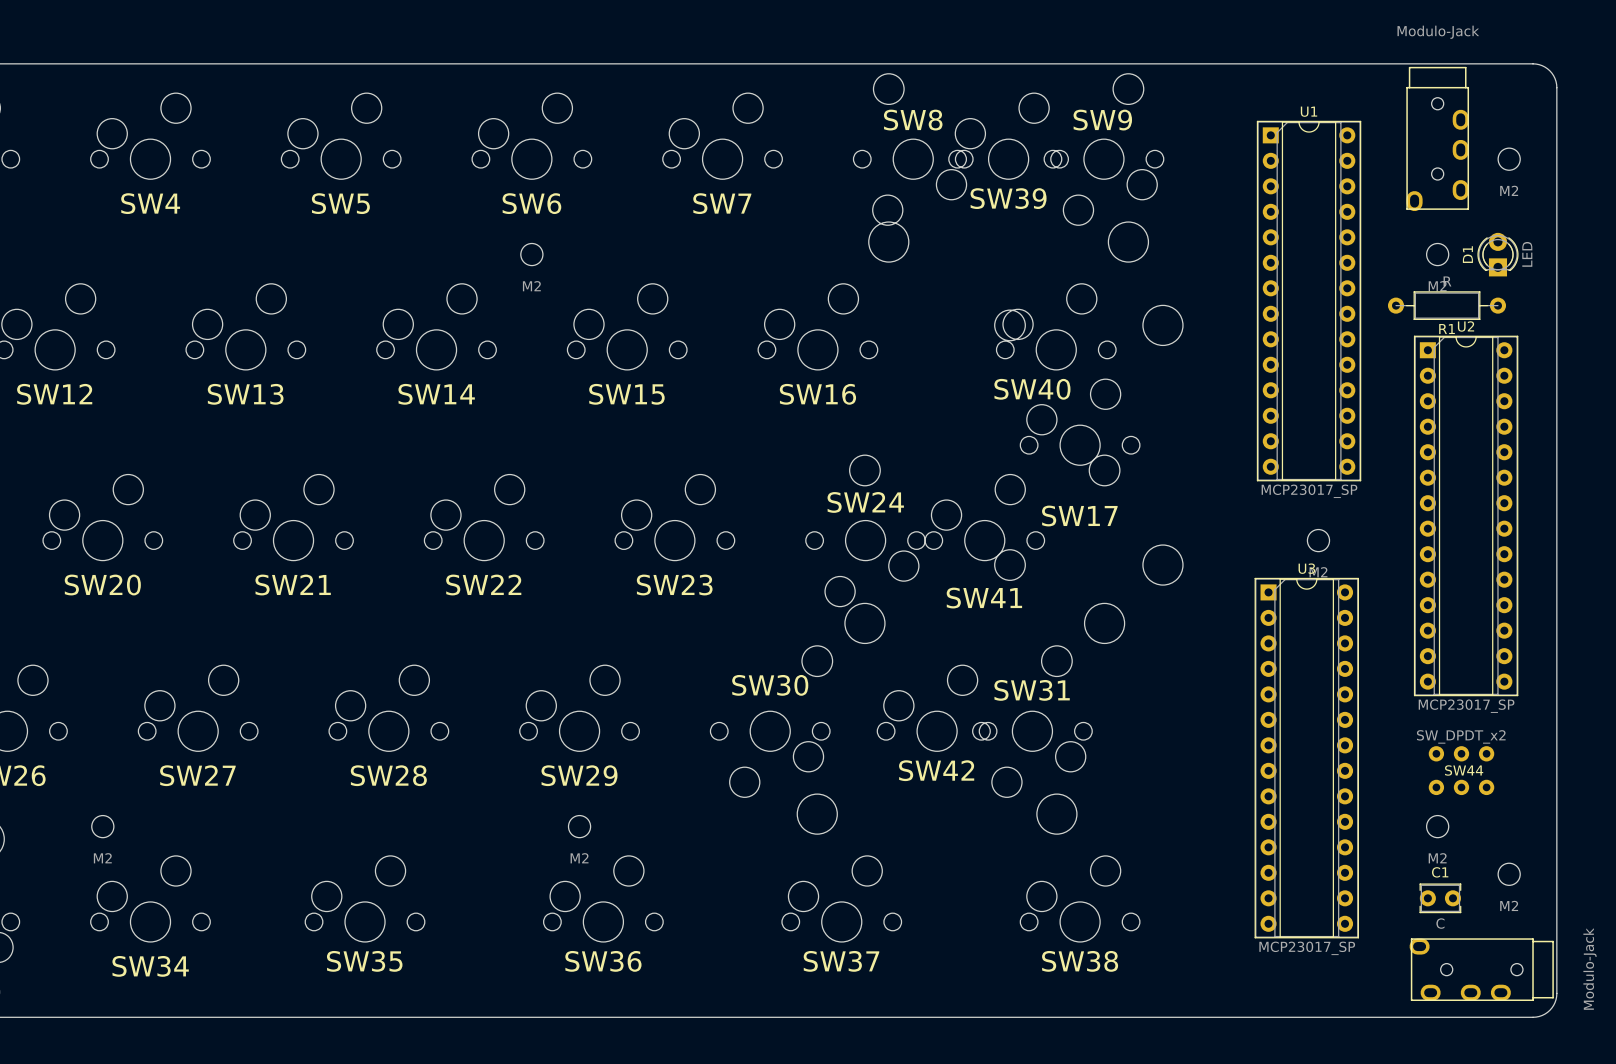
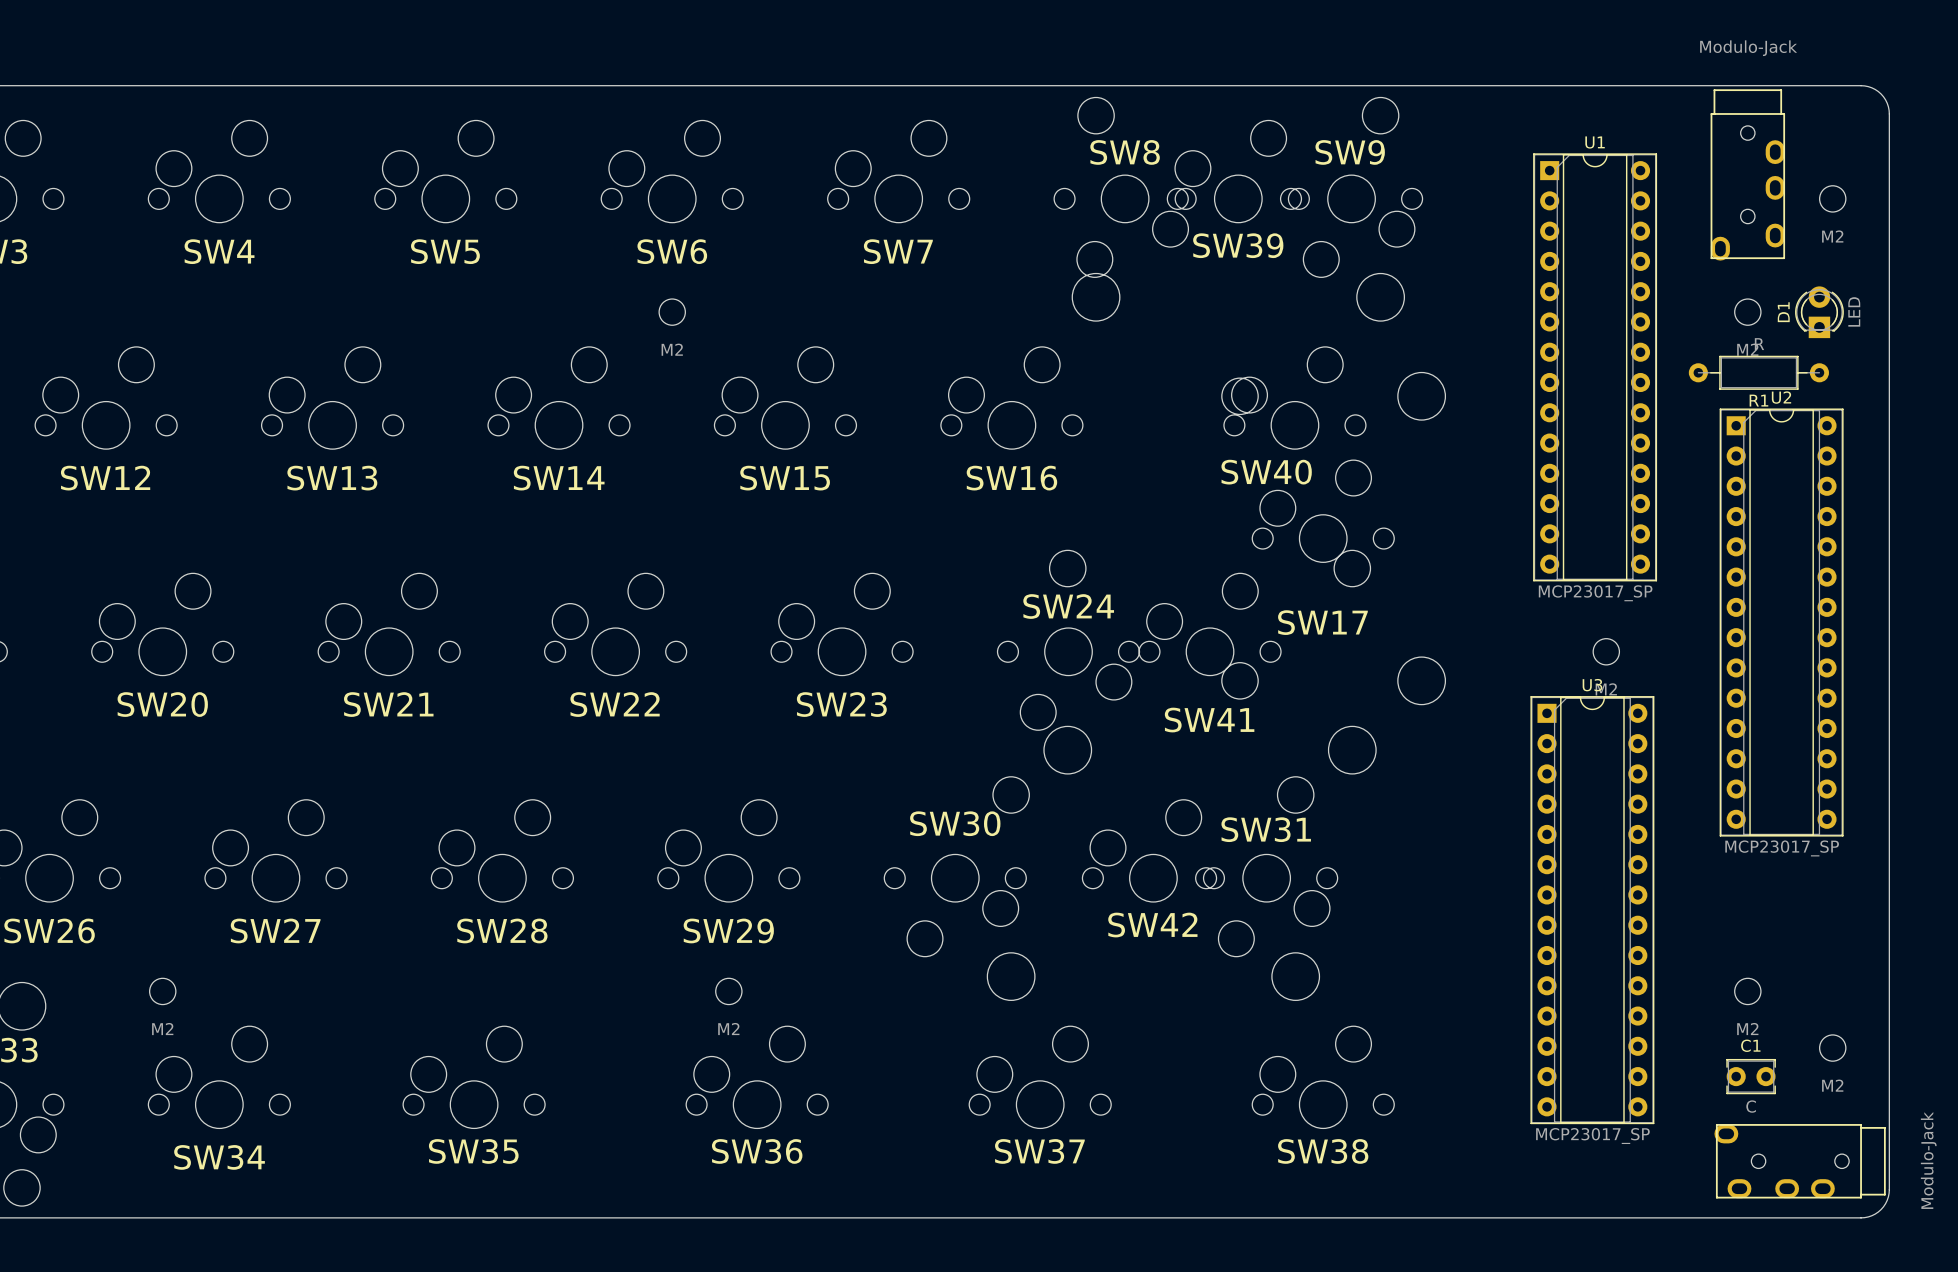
SW44: SW_DPDT_x2 (1461, 770) -> none

